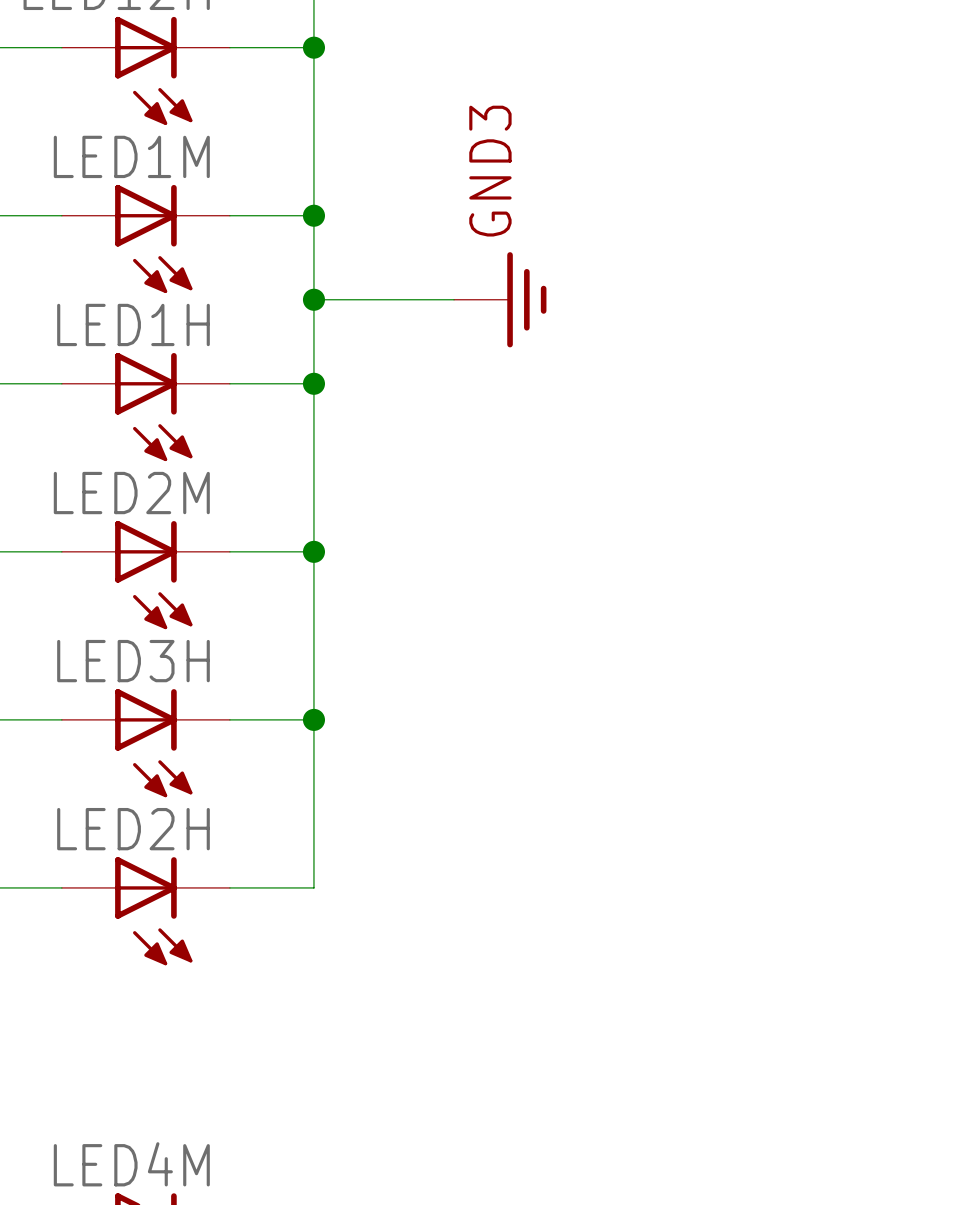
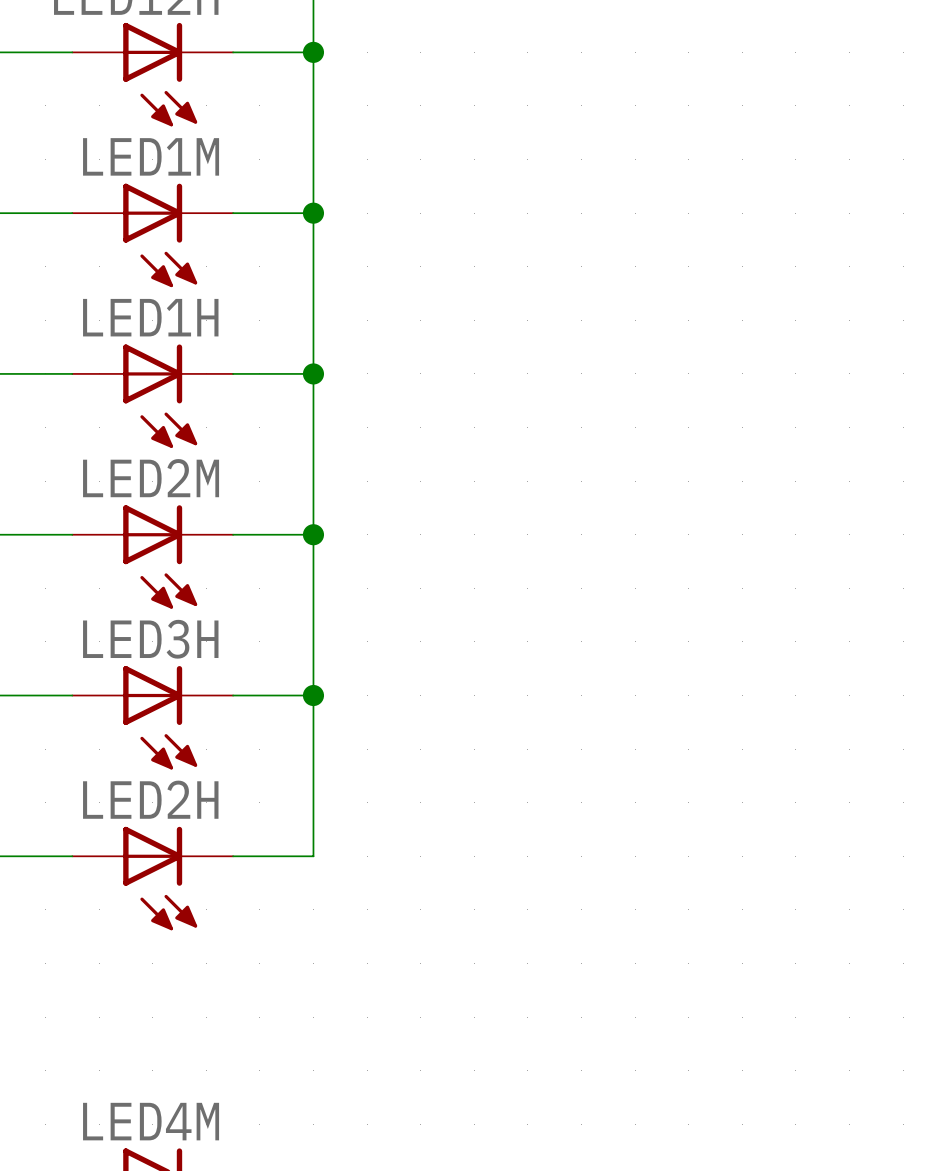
wire: (313, 299) (454, 299) -> none
junction: (313, 299) -> none
GND3: (500, 299) -> none

